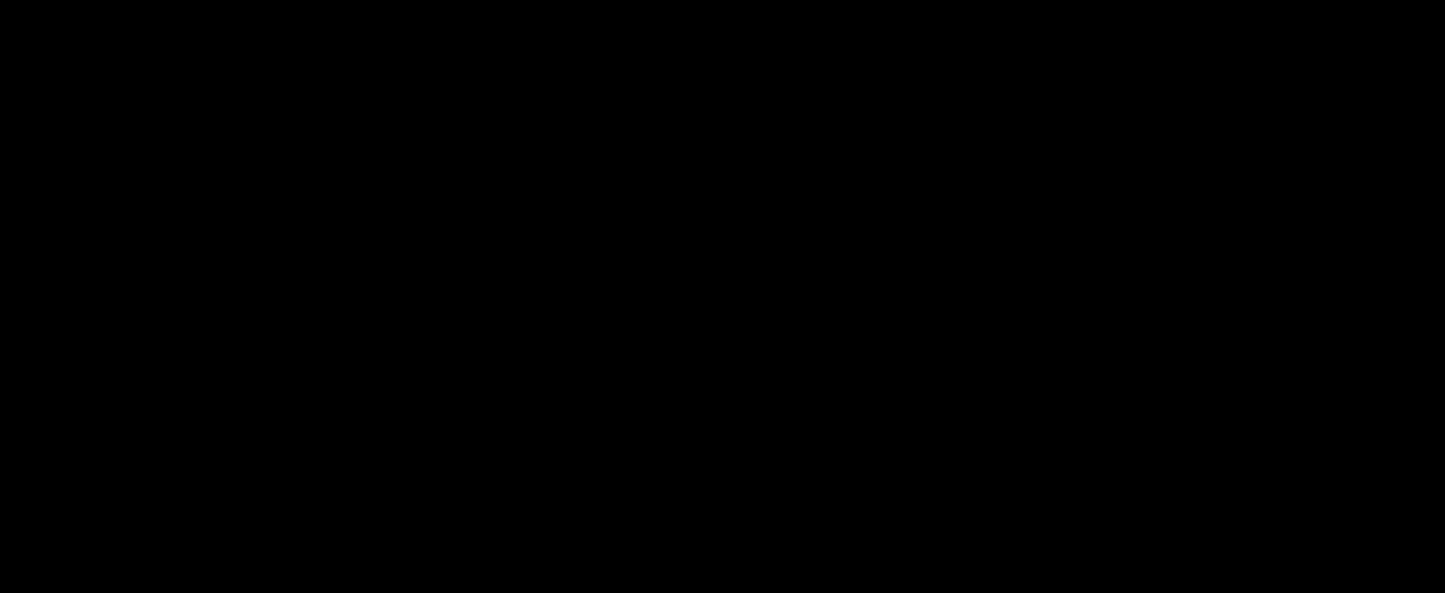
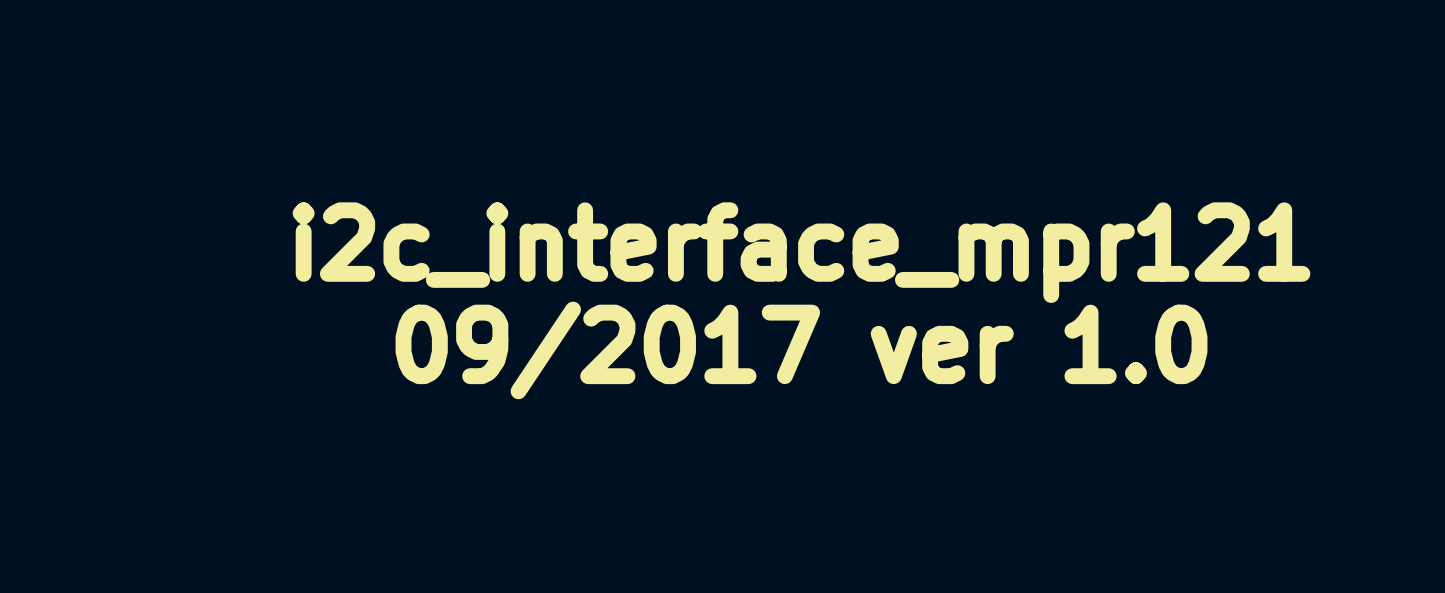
text: none -> i2c_interface_mpr121 (801, 252)
text: none -> 09/2017 ver 1.0 (801, 350)

